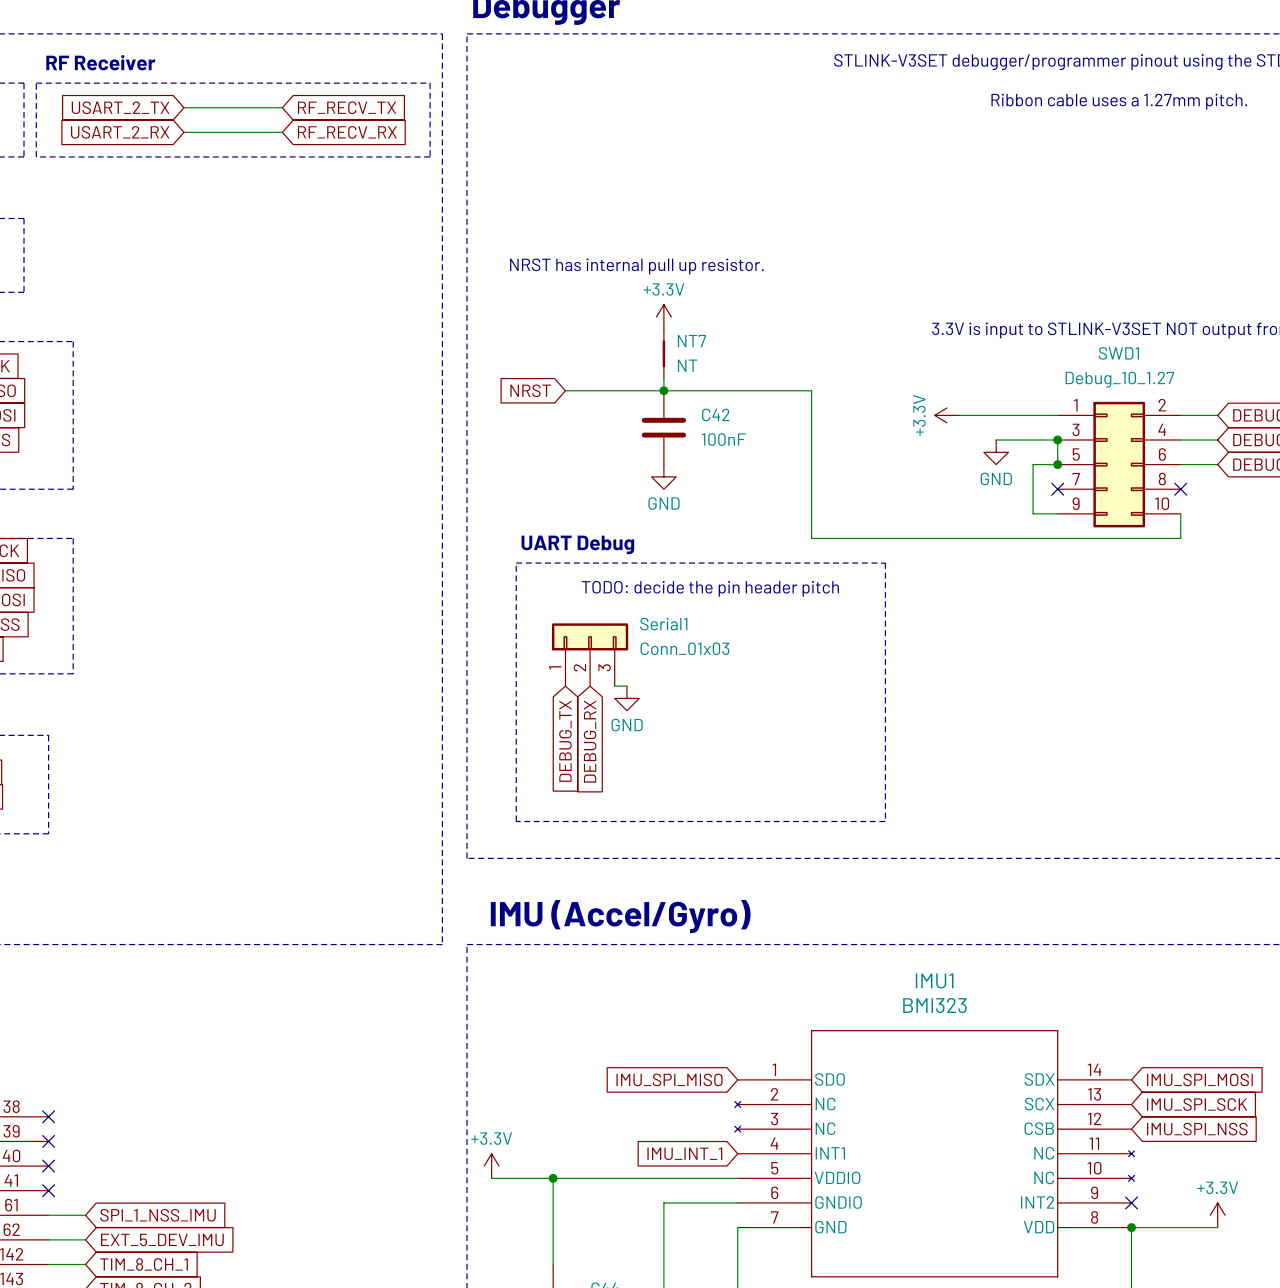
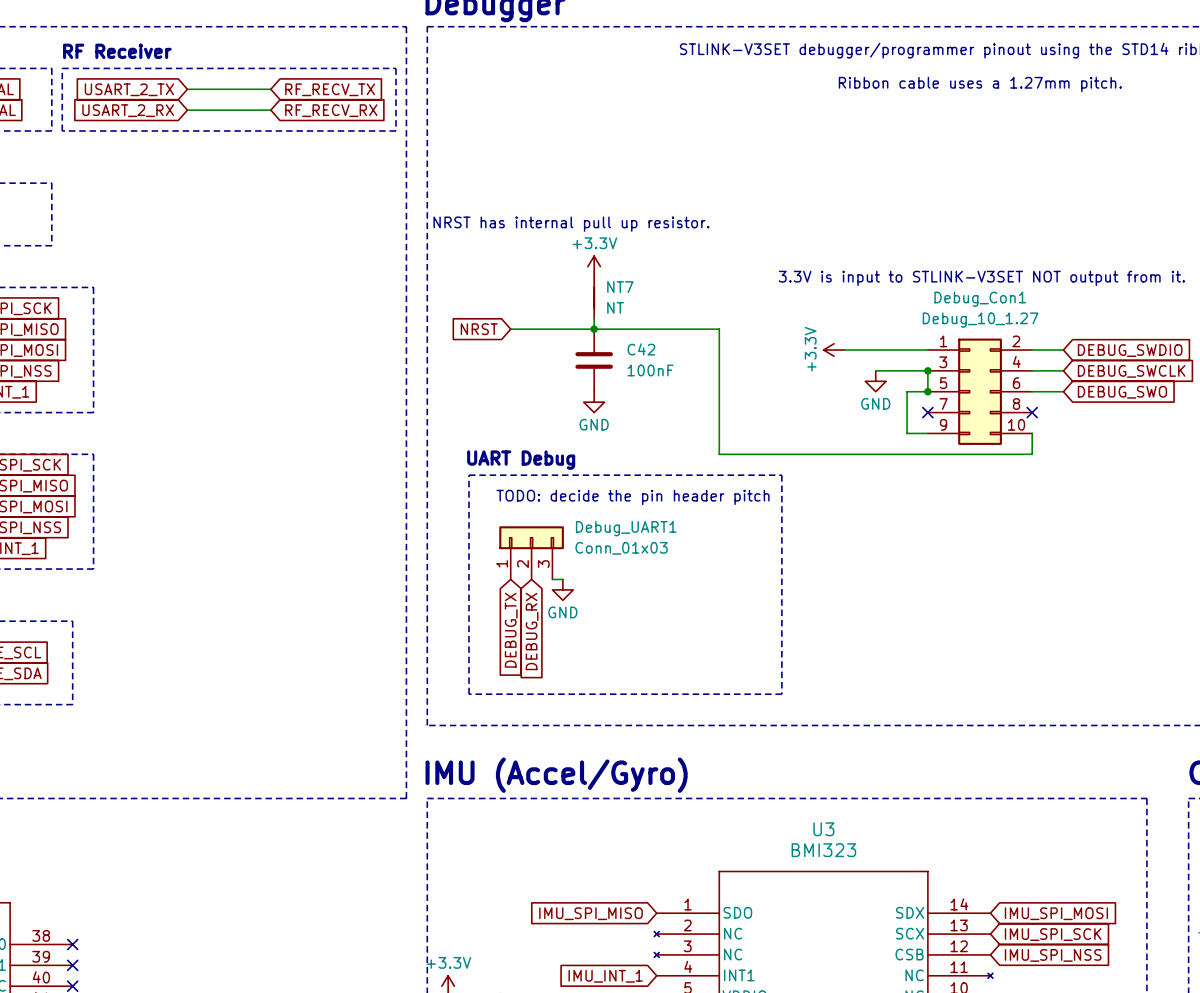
SWD1 name: SWD1 (1118, 353) -> Debug_Con1 (980, 299)
Serial1 name: Serial1 (663, 624) -> Debug_UART1 (626, 528)
IMU1 name: IMU1 (934, 981) -> U3 (823, 829)

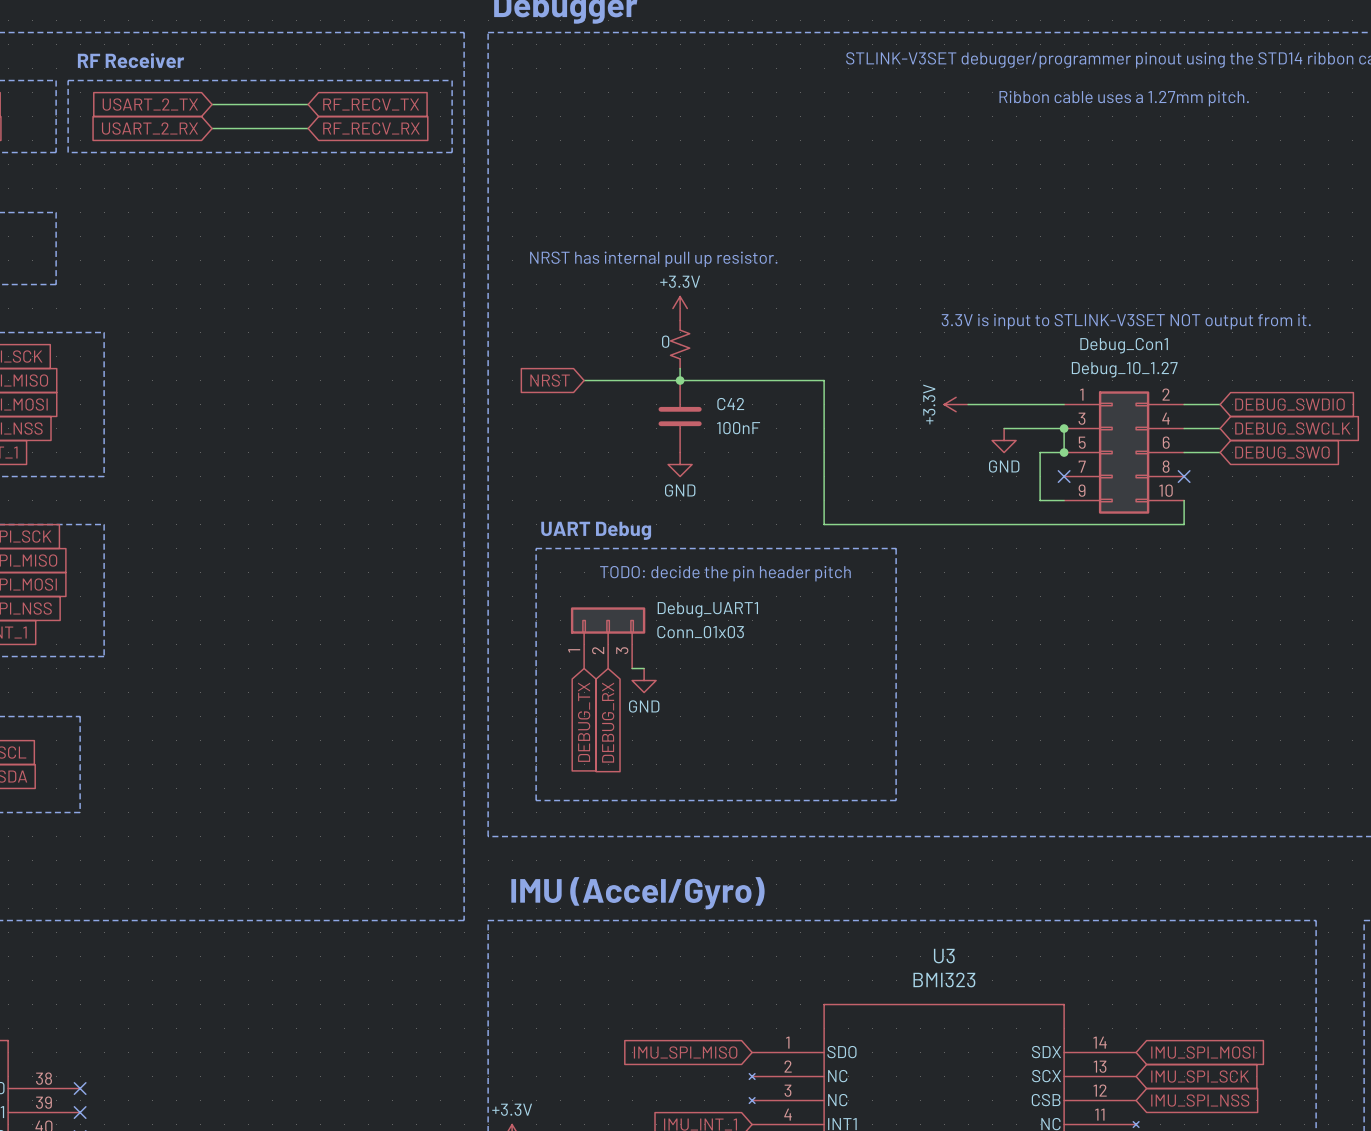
NT7: NT (594, 297) -> none
part: none -> 0 (680, 344)

